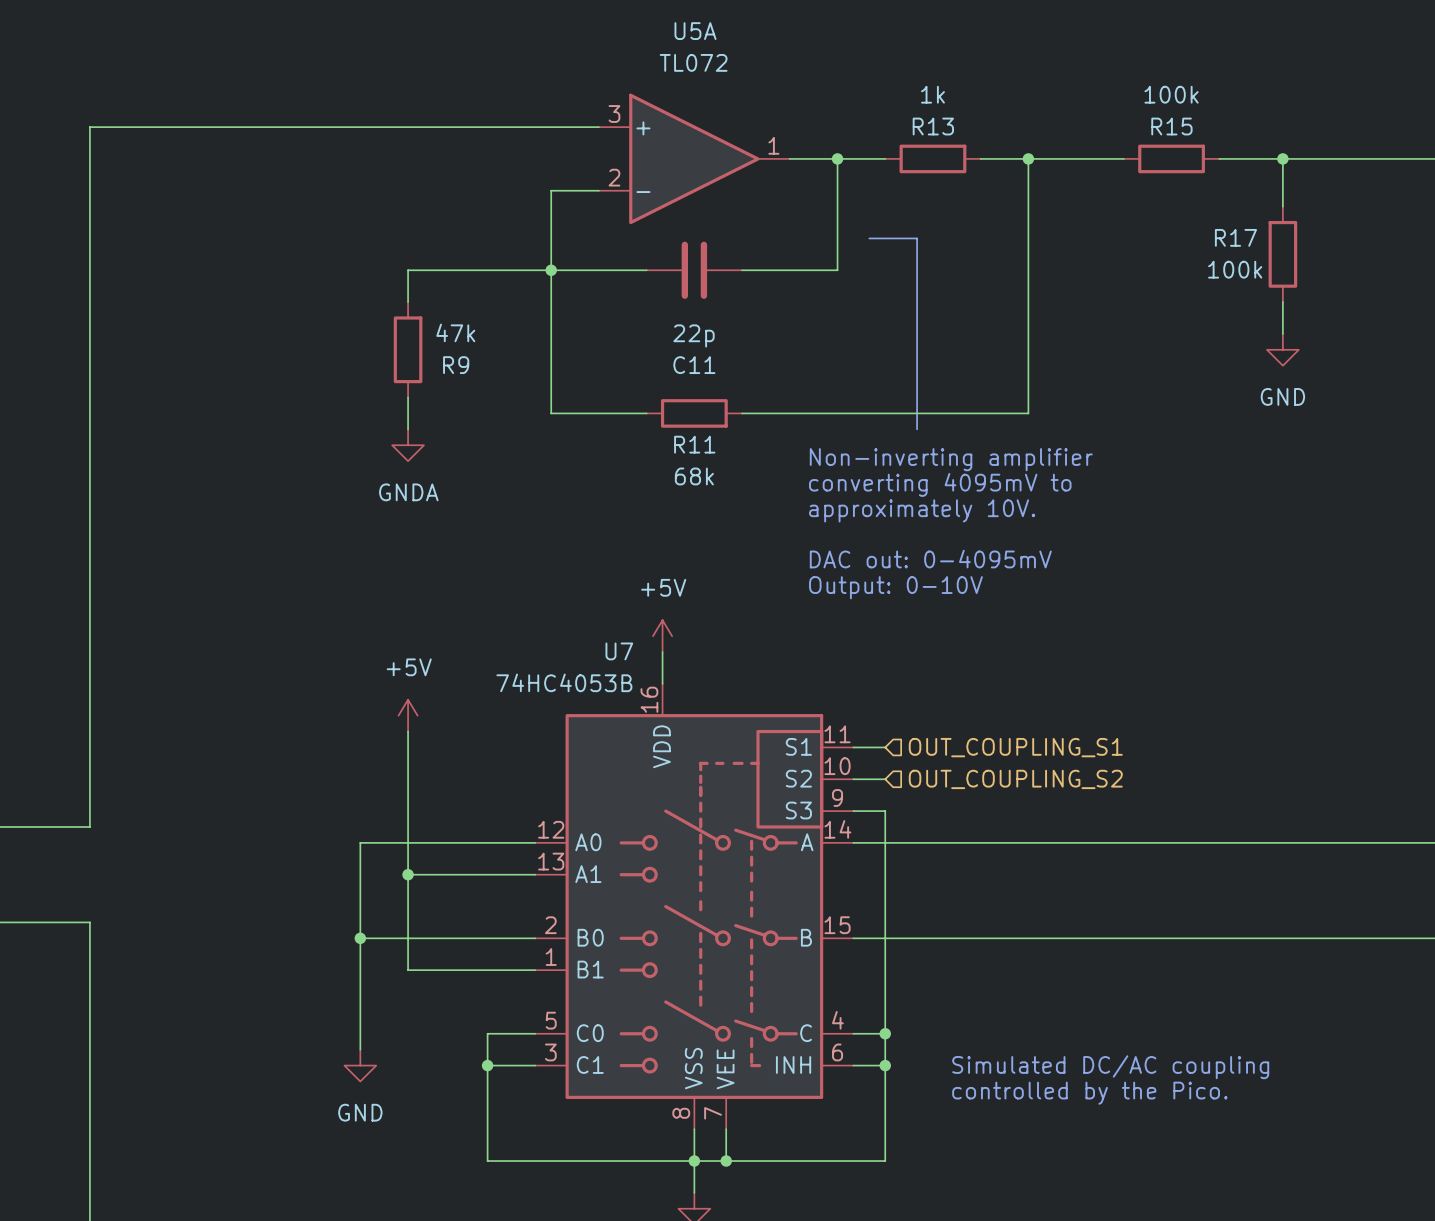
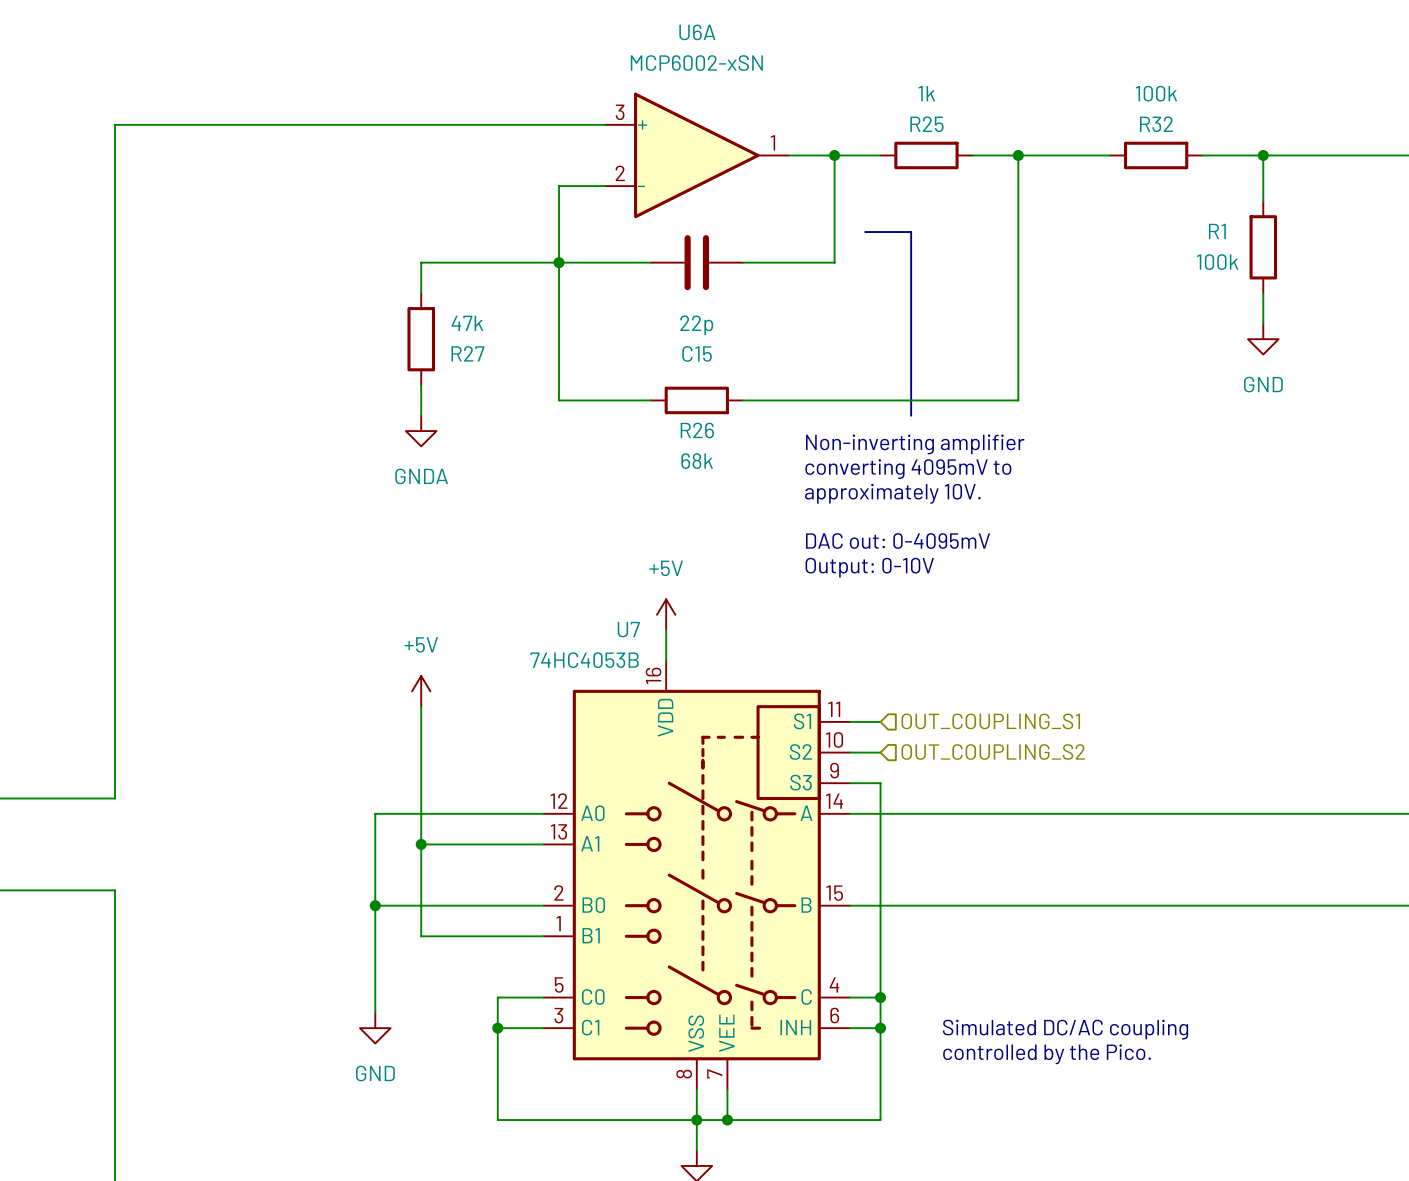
U5A name: U5A (695, 31) -> U6A (697, 32)
U5A value: TL072 (693, 62) -> MCP6002-xSN (696, 63)
R13 name: R13 (933, 126) -> R25 (926, 124)
R15 name: R15 (1171, 126) -> R32 (1156, 124)
R17 name: R17 (1235, 237) -> R1 (1217, 231)
R9 name: R9 (456, 365) -> R27 (467, 353)
C11 name: C11 (694, 365) -> C15 (697, 353)
R11 name: R11 (694, 444) -> R26 (697, 430)

